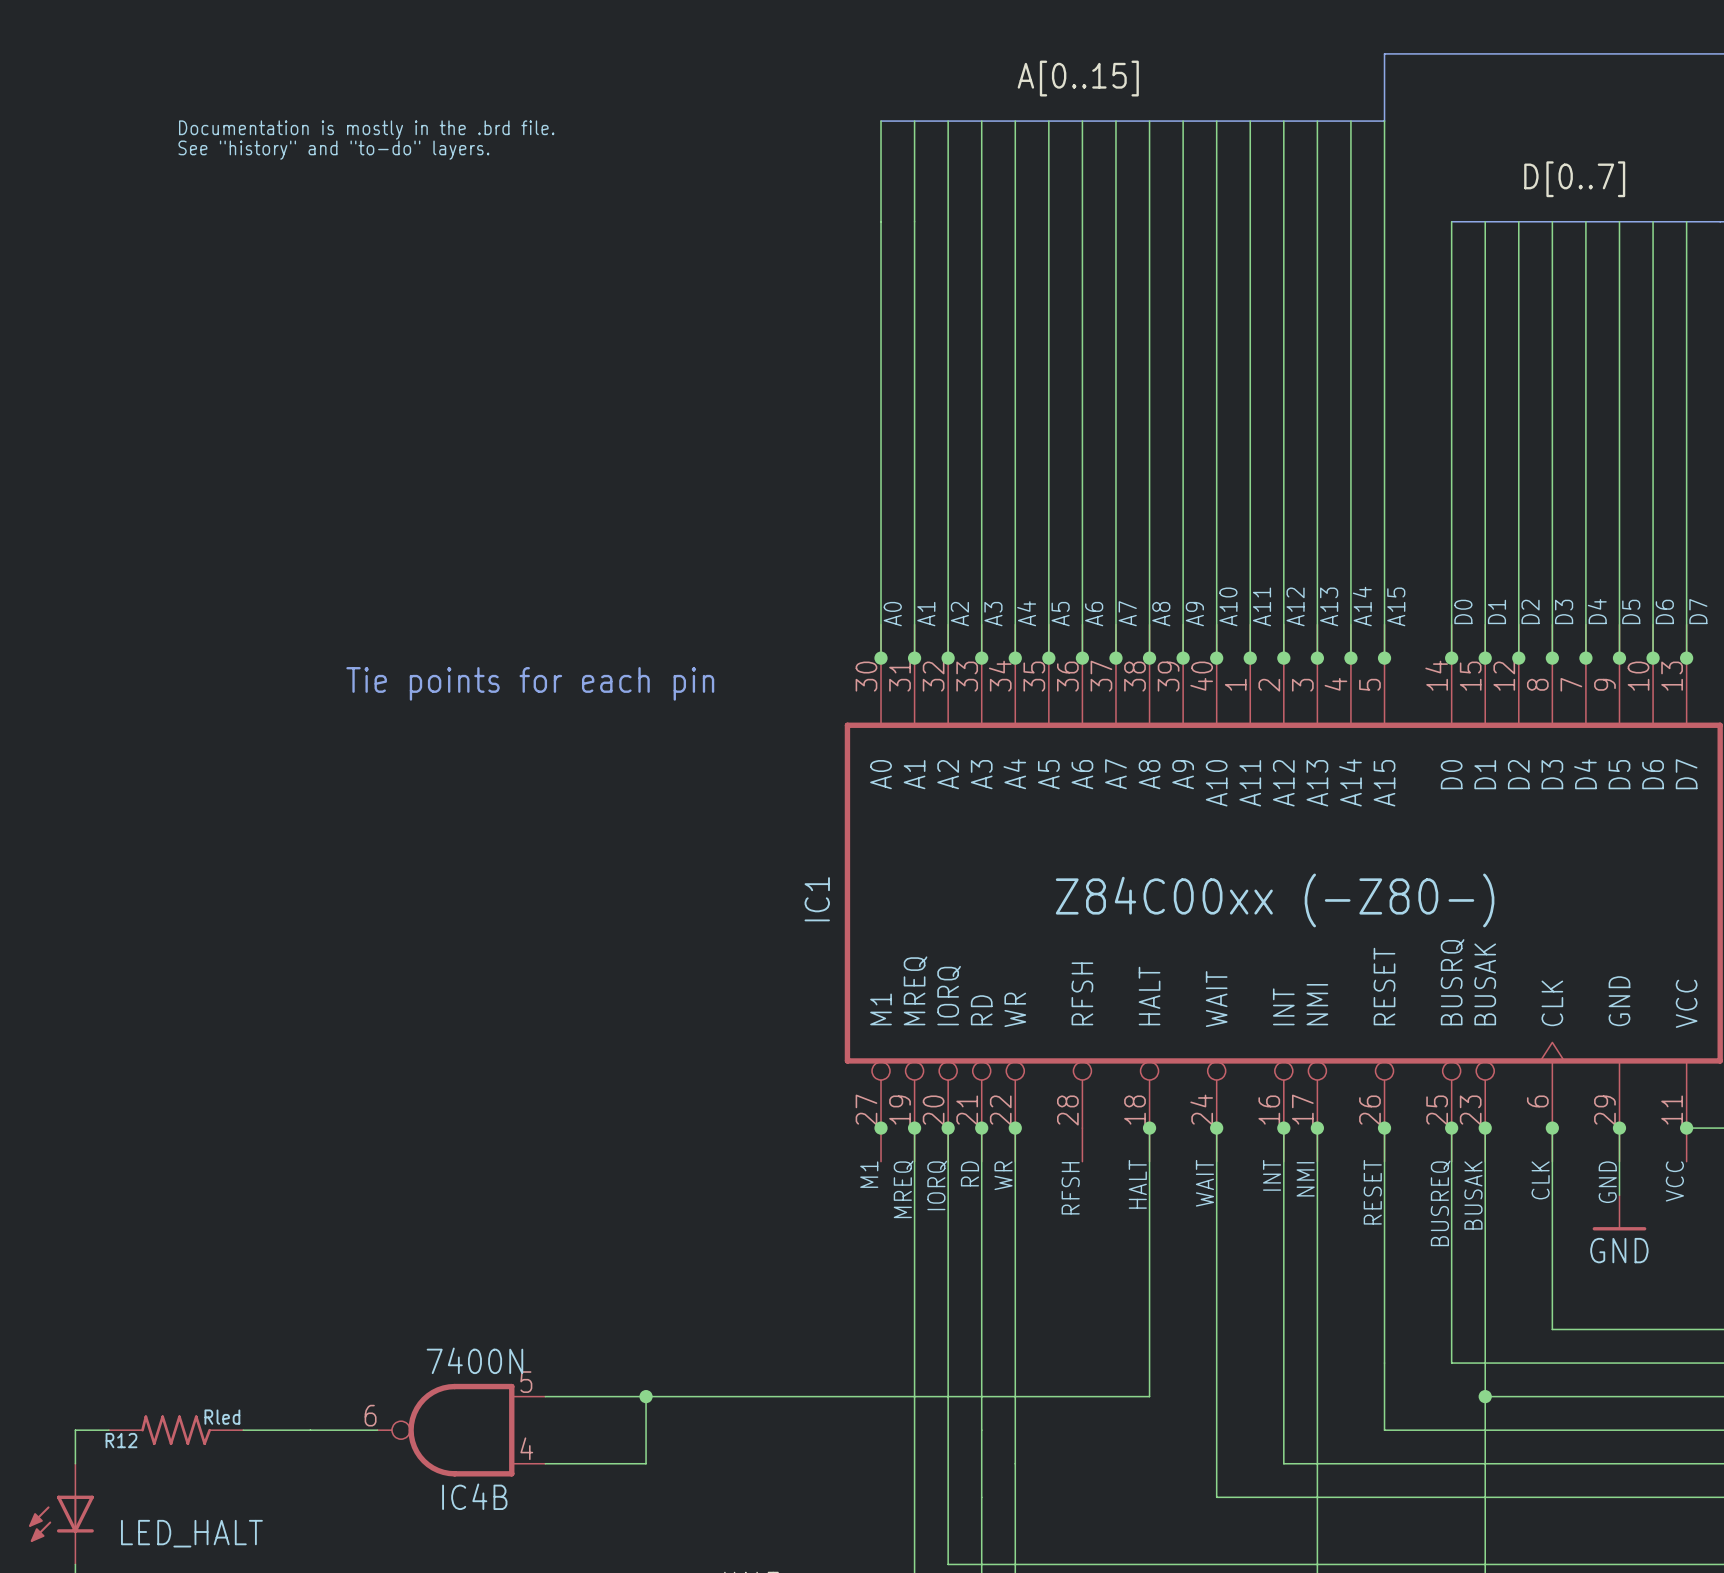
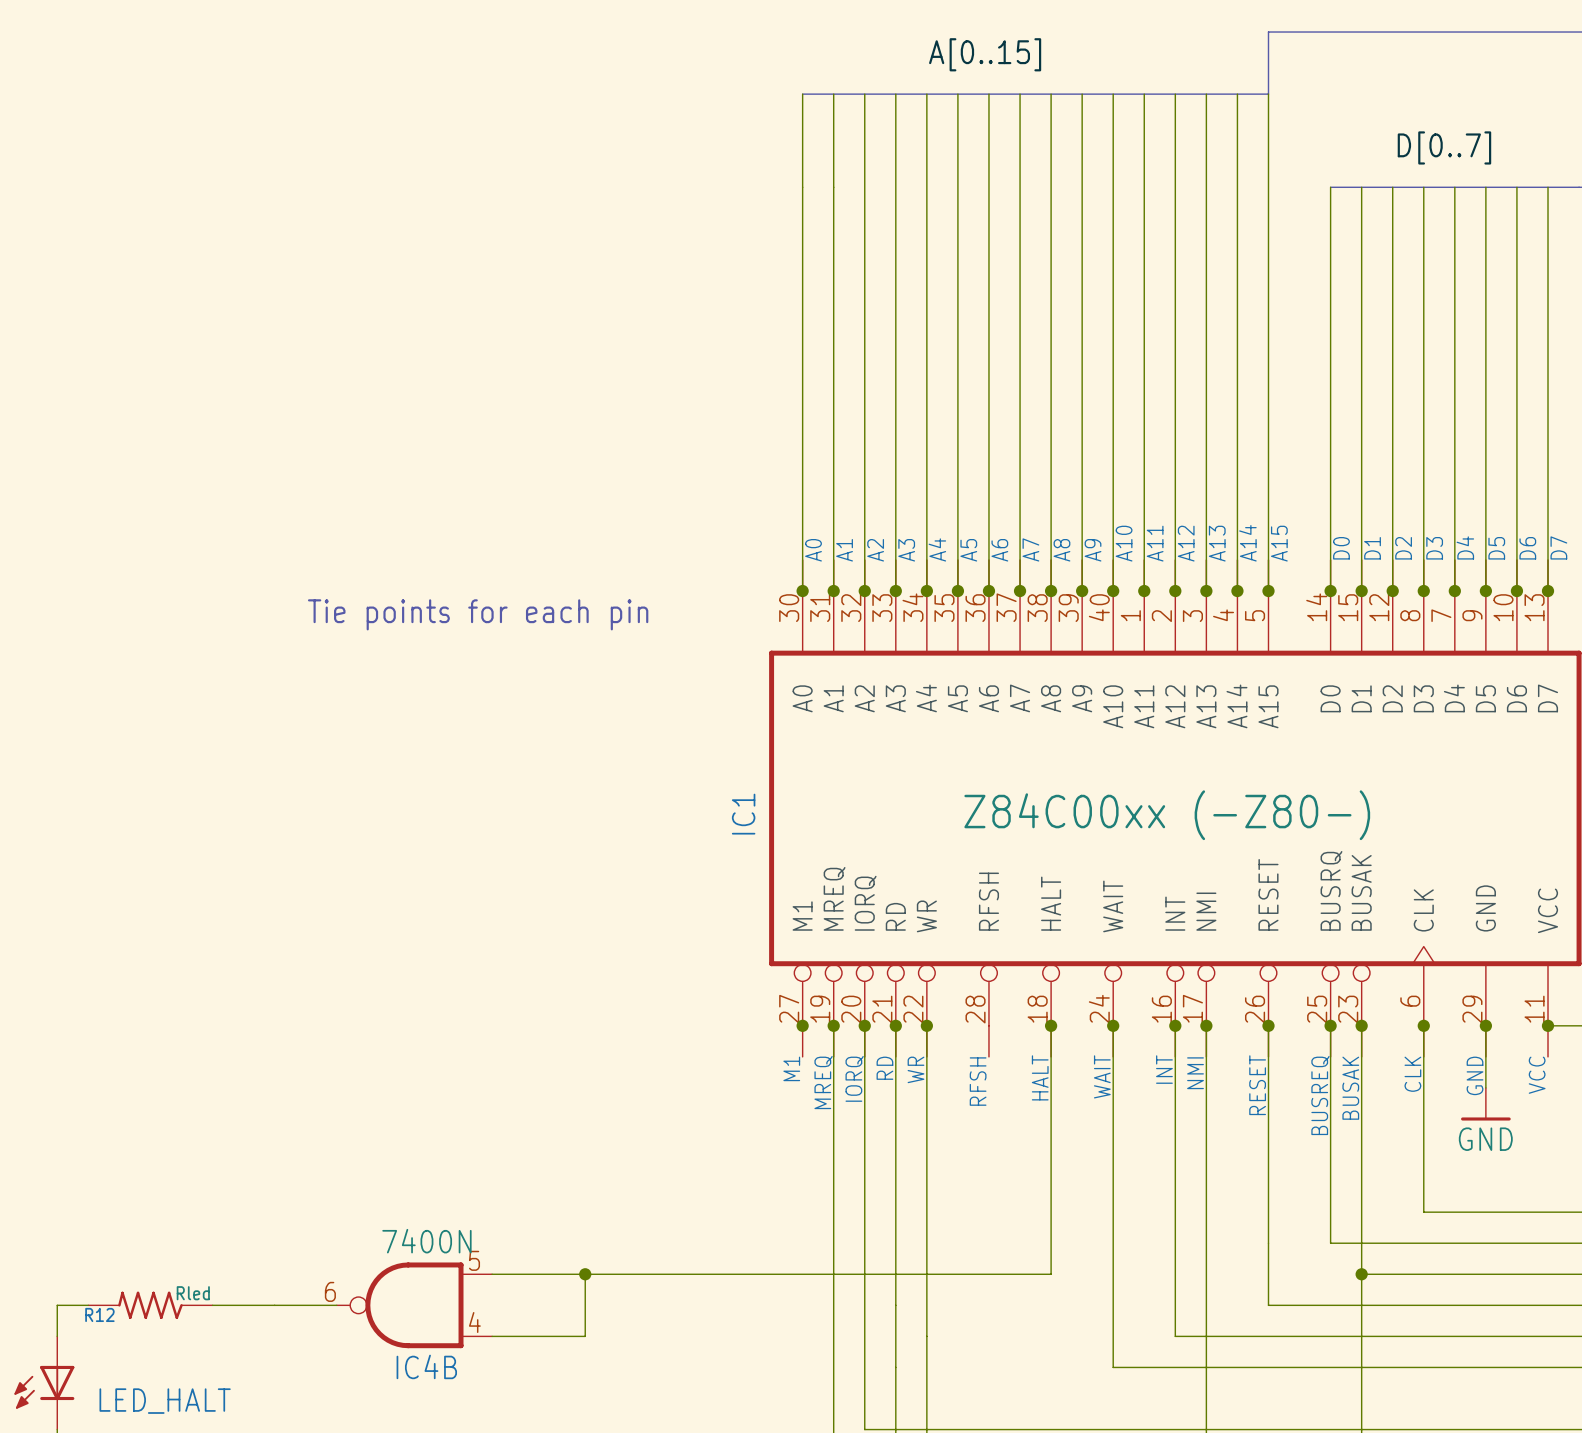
text: Documentation is mostly in the .brd file. (366, 130) -> none
text: See "history" and "to-do" layers. (333, 150) -> none

